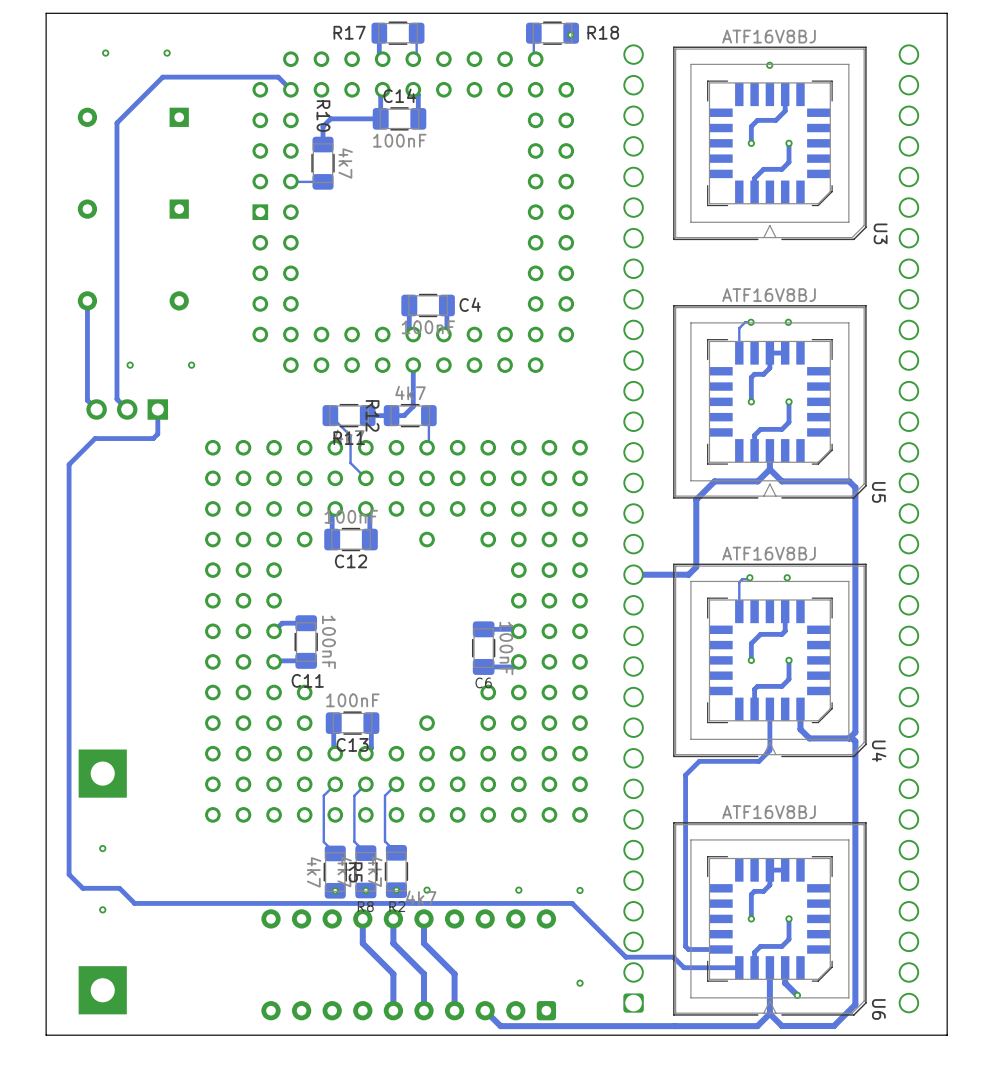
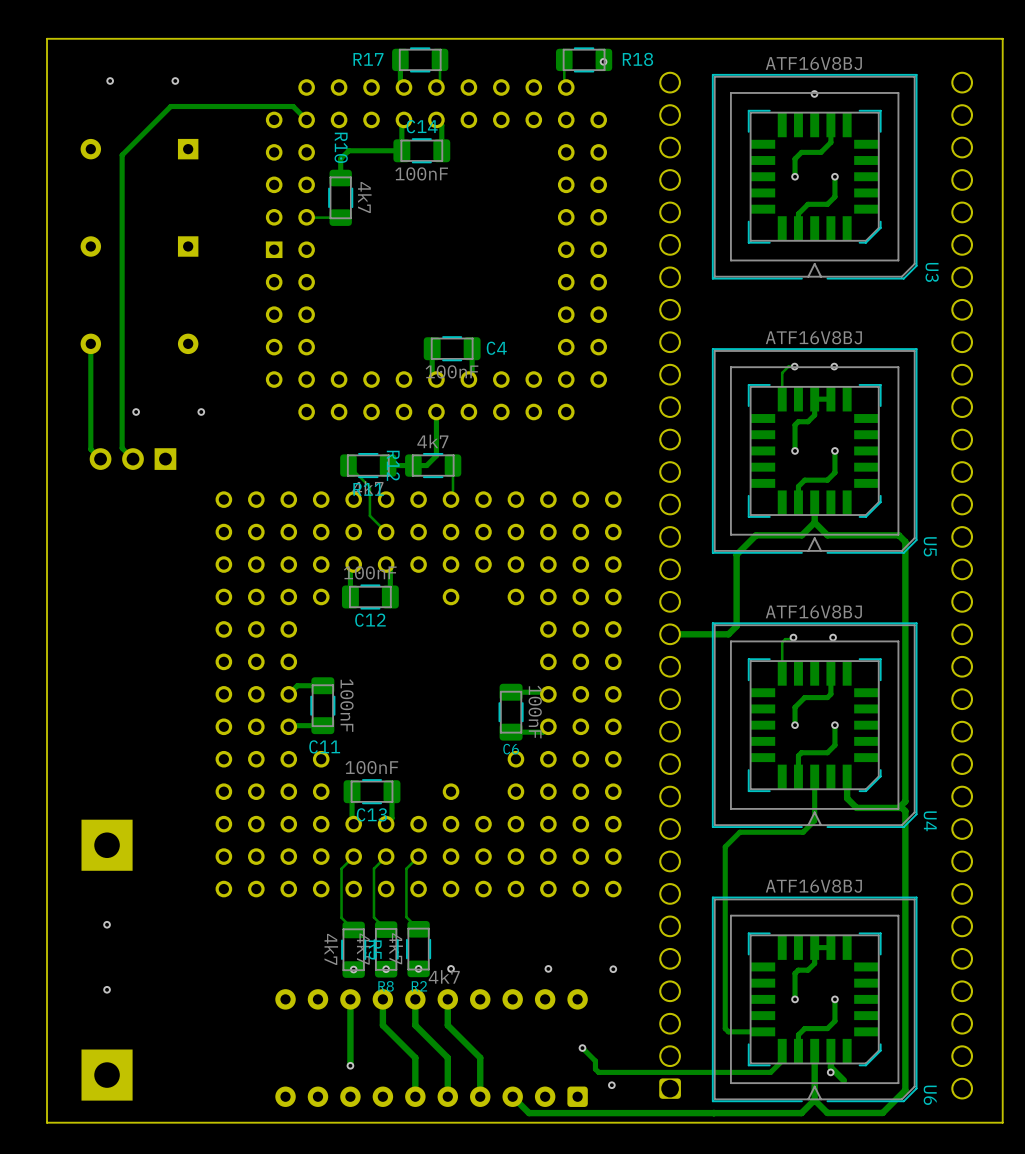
track: (157, 409) (157, 433) (153, 438) (95, 438) (69, 464) (69, 874) (82, 888) (119, 888) (134, 903) (572, 903) (625, 957) (673, 957) (684, 967) (739, 967) -> (582, 1048) (595, 1061) (595, 1069) (598, 1072) (770, 1072) (782, 1060) (782, 1051)
track: none -> (350, 999) (350, 1065)
via: none -> (582, 1048)
via: none -> (350, 1065)
via position: (580, 983) -> (611, 1085)
via position: (797, 995) -> (830, 1072)

